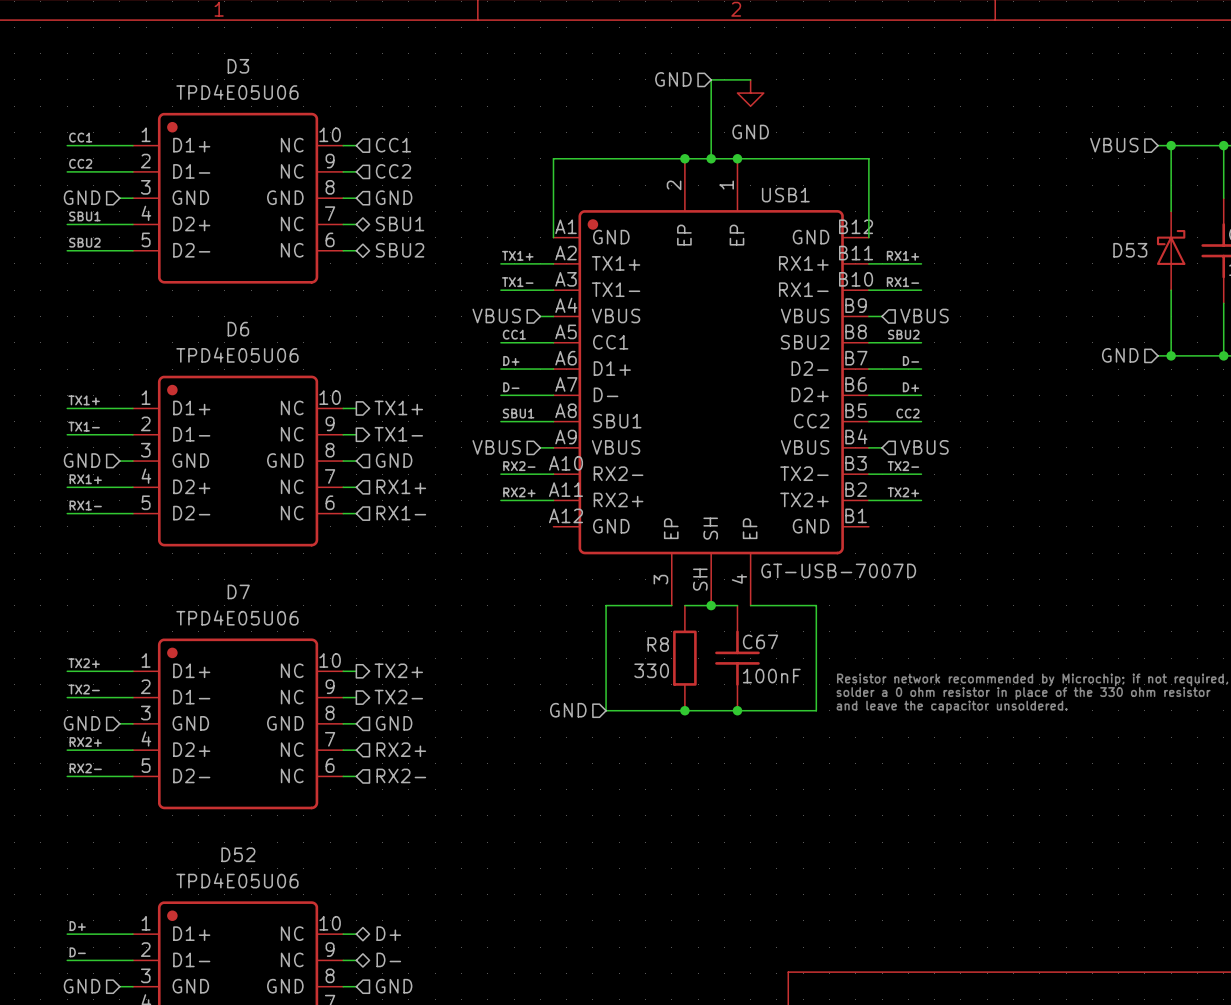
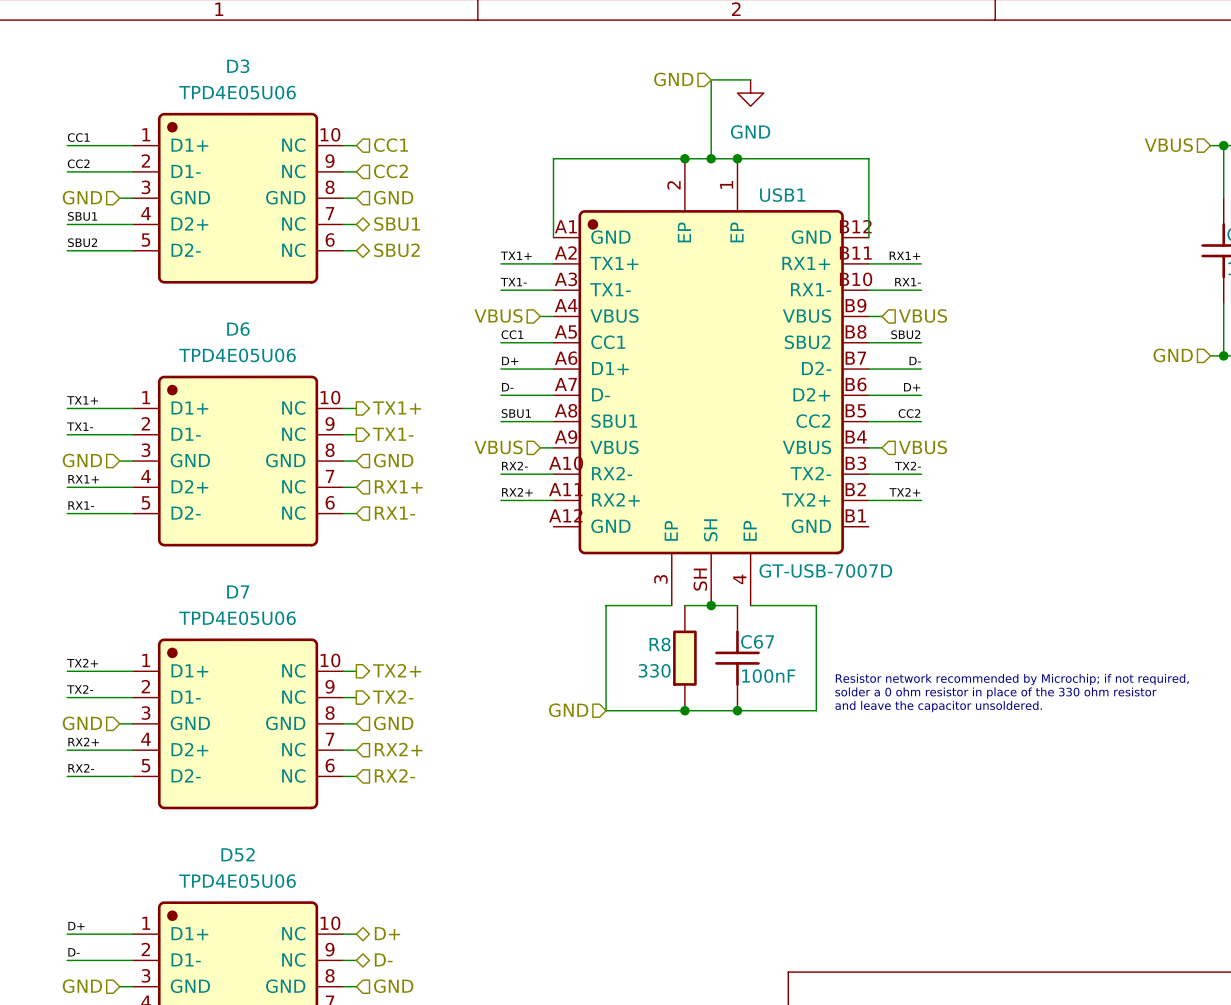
hierarchical label position: VBUS (1114, 145) -> VBUS (1168, 145)
wire: (1158, 145) (1210, 145) -> none
wire: (1171, 145) (1171, 211) -> none
junction: (1171, 145) -> none
D53: (1171, 250) -> none
wire: (1171, 290) (1171, 355) -> none
hierarchical label position: GND (1120, 355) -> GND (1173, 355)
wire: (1158, 355) (1210, 355) -> none
junction: (1171, 355) -> none

